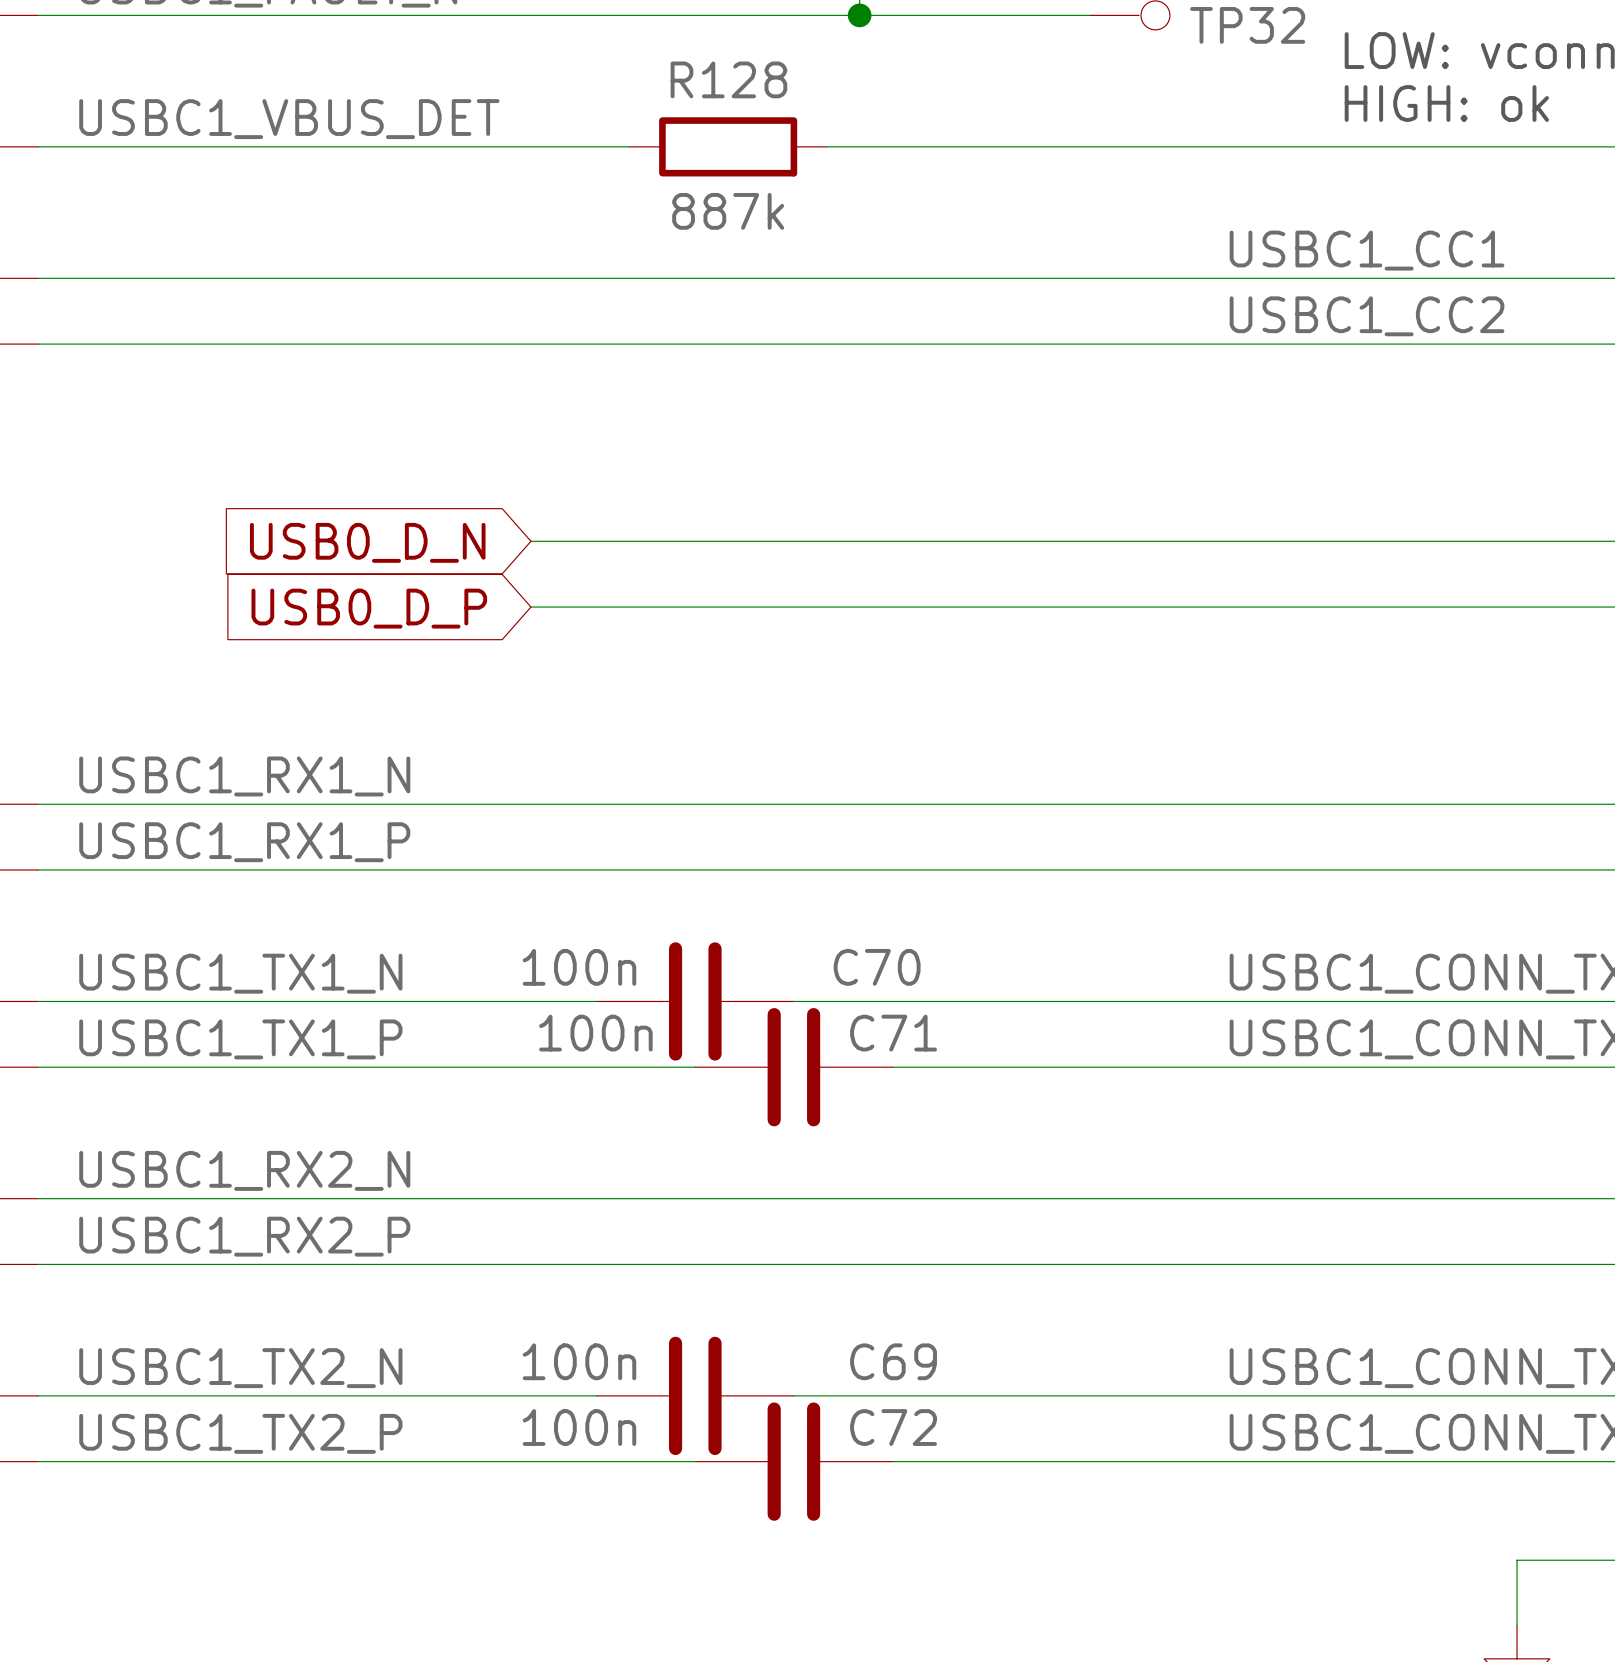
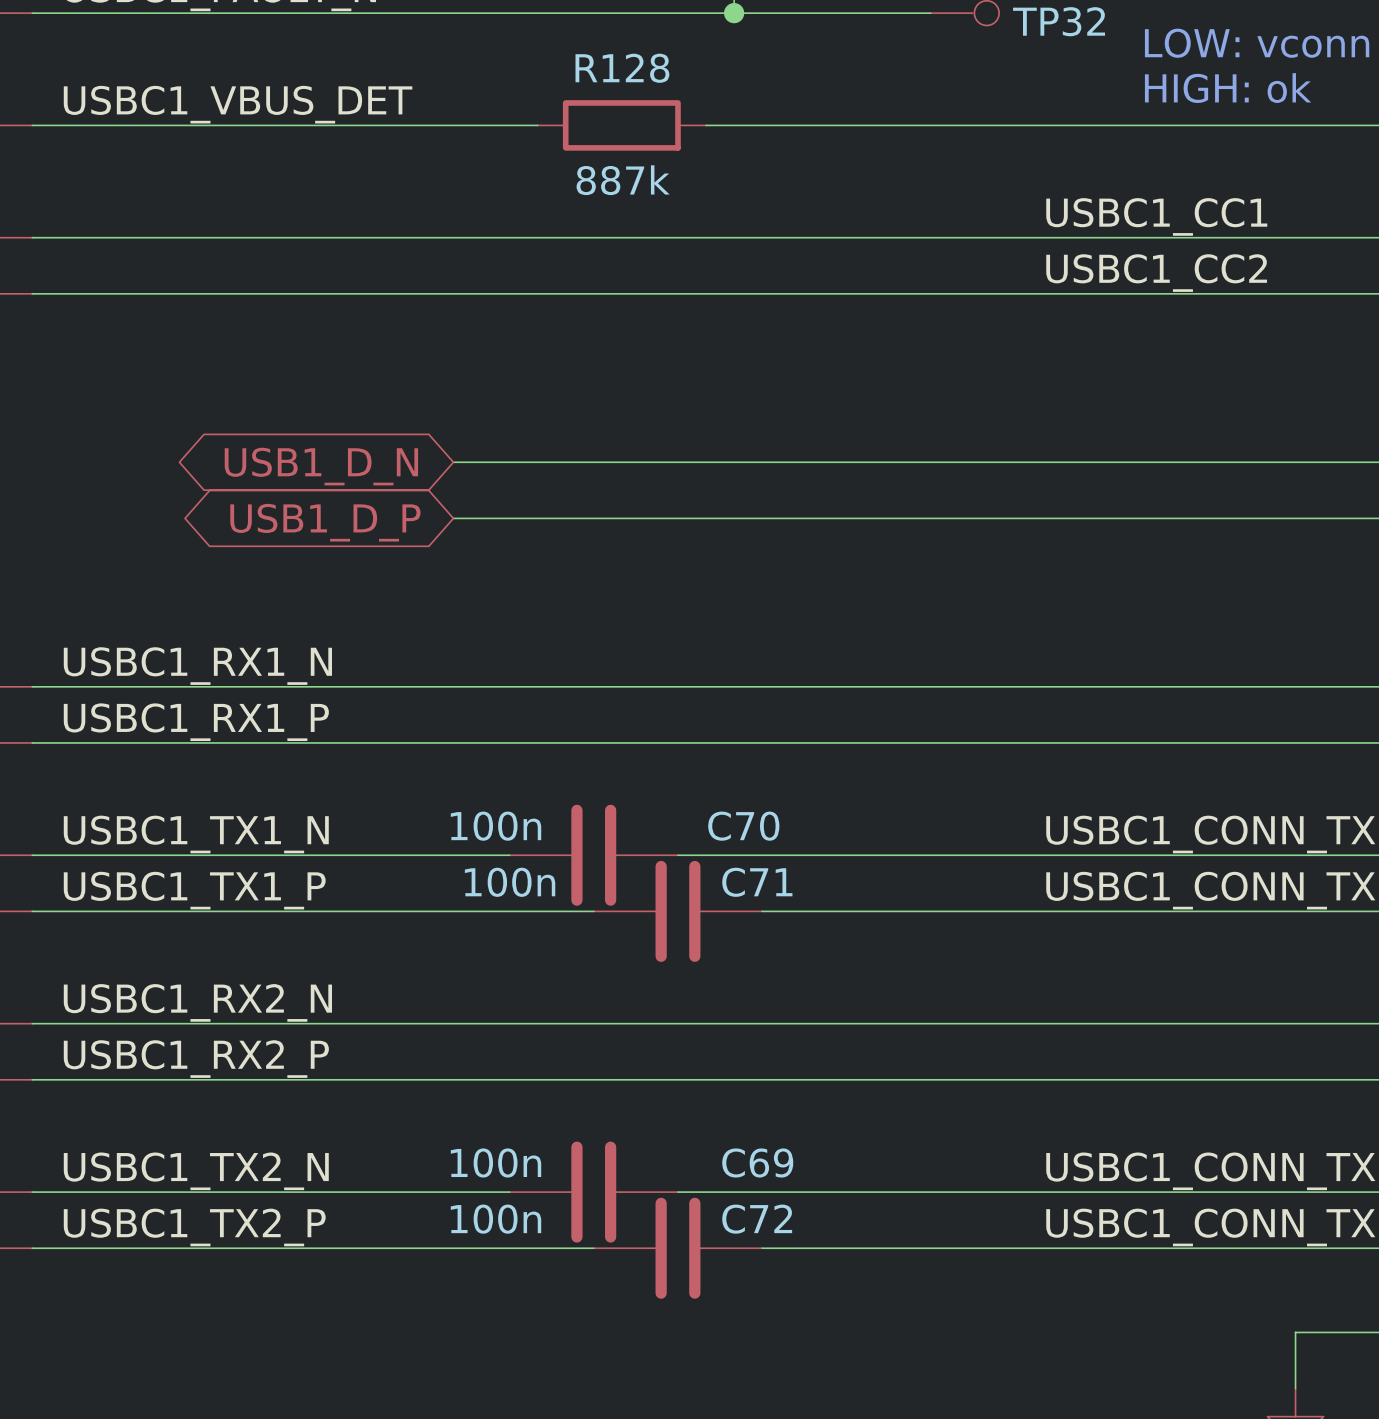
global label shape: input (367, 542) -> bidirectional (321, 466)
global label: USB0_D_N (367, 542) -> USB1_D_N (321, 466)
global label shape: input (369, 608) -> bidirectional (325, 522)
global label: USB0_D_P (369, 608) -> USB1_D_P (325, 522)

